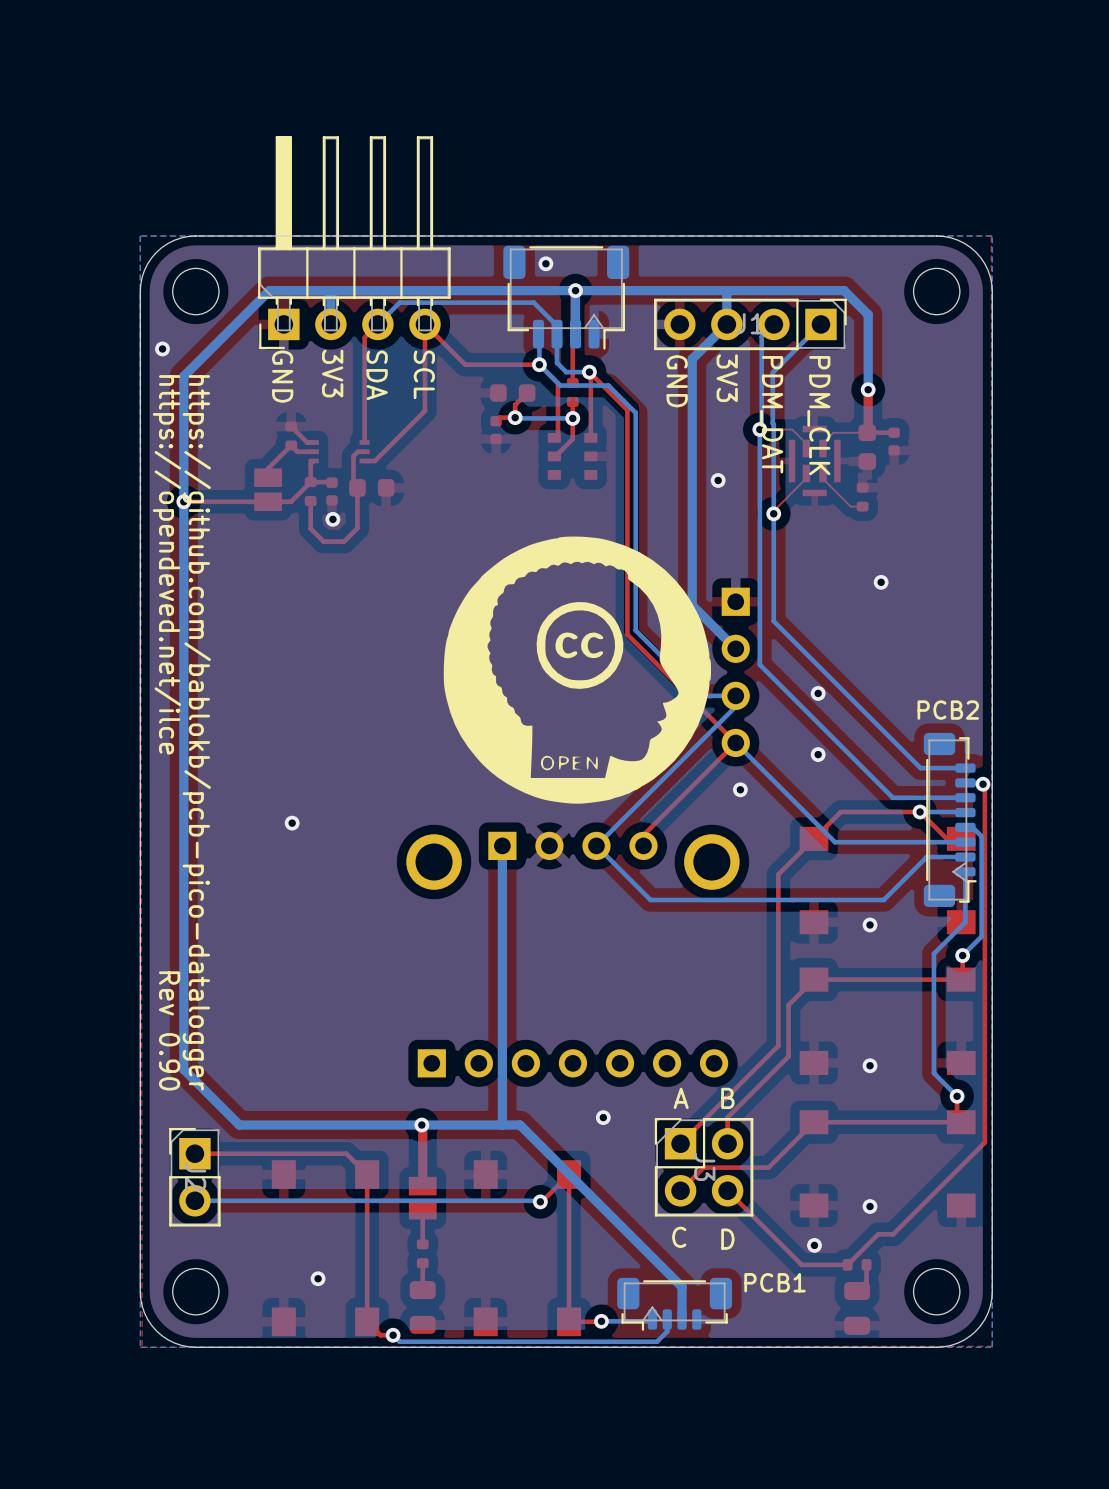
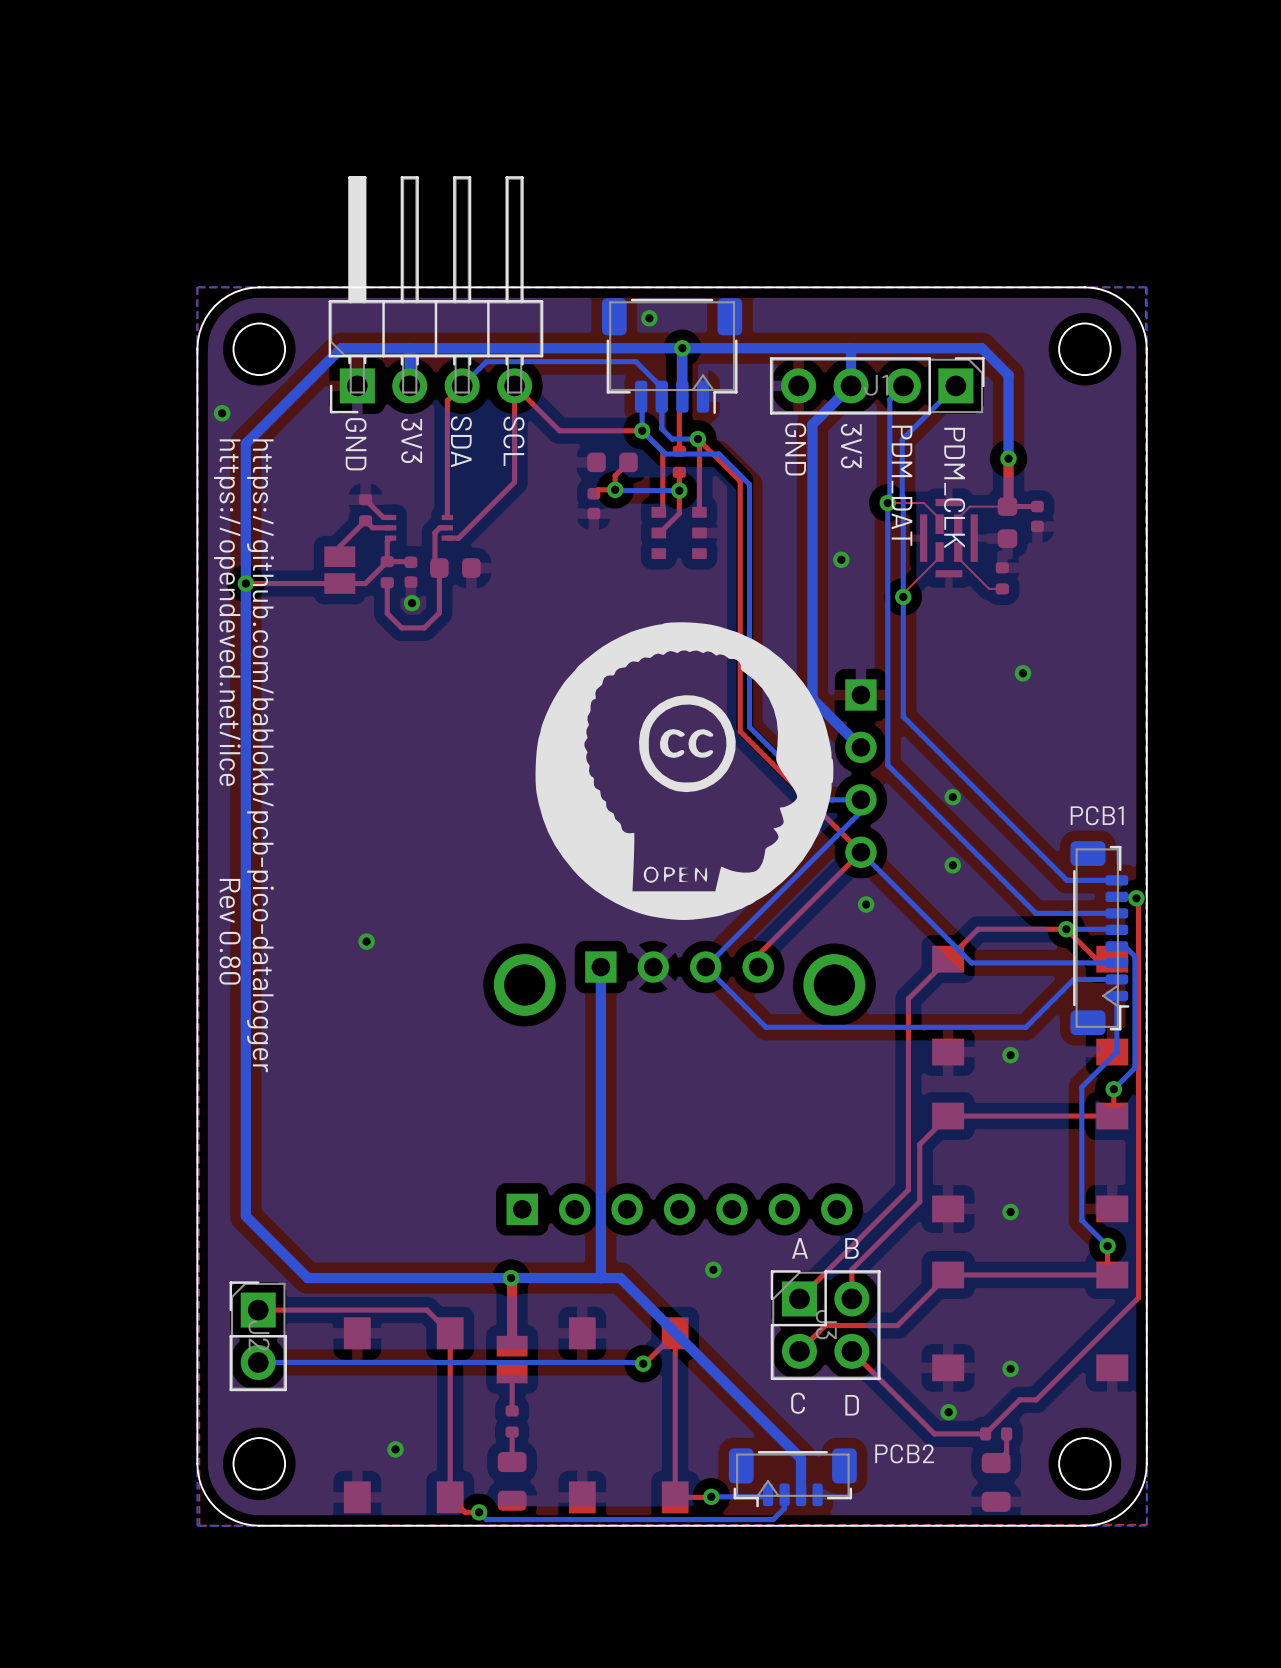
text: PCB2 (948, 710) -> PCB1 (1097, 815)
text: https://opendeved.net/ilce Rev 0.90 (166, 732) -> https://opendeved.net/ilce Rev 0.80 (227, 711)
text: PCB1 (775, 1282) -> PCB2 (904, 1453)

